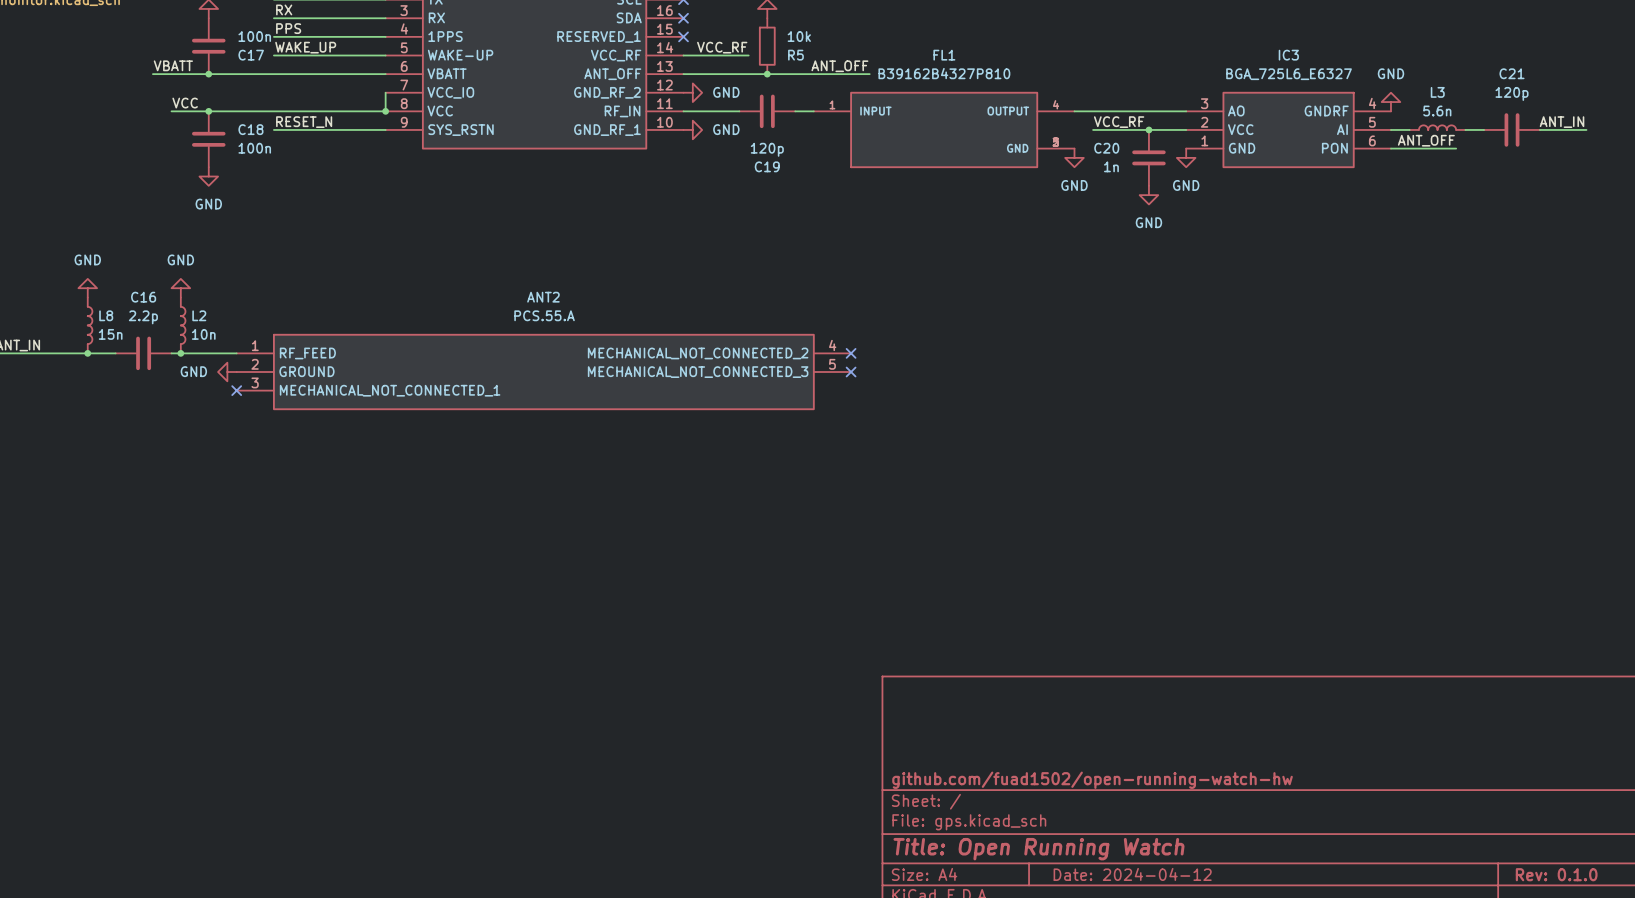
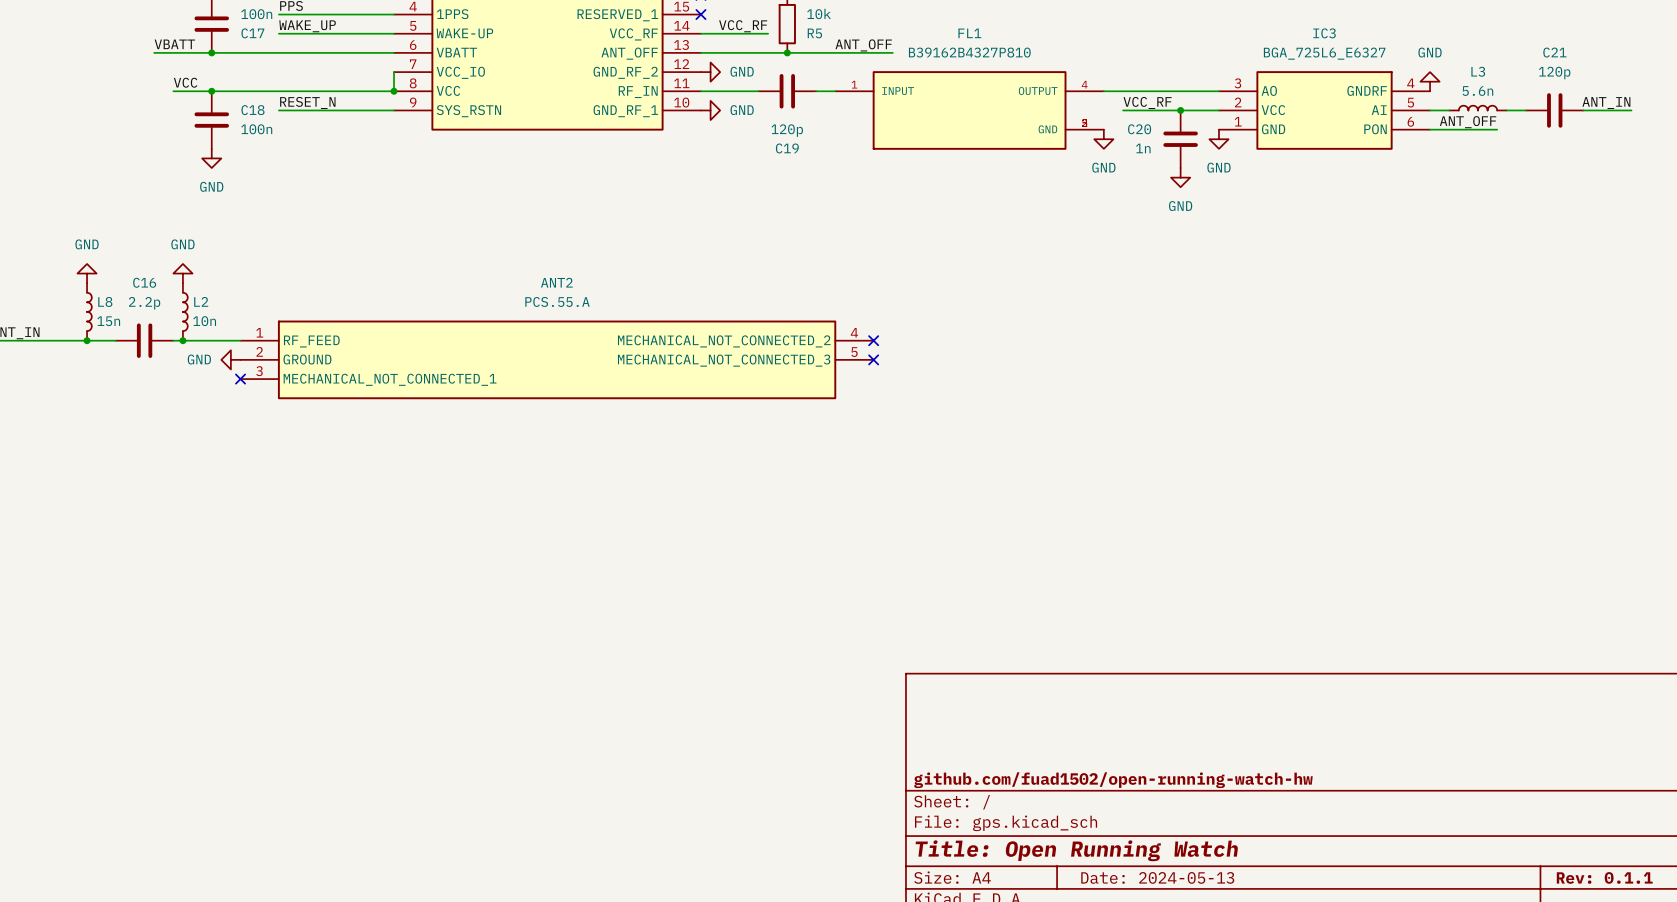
title block: Date: 2024-04-12 (1132, 874) -> Date: 2024-05-13 (1157, 877)
title block: Rev: 0.1.0 (1556, 874) -> Rev: 0.1.1 (1604, 877)

